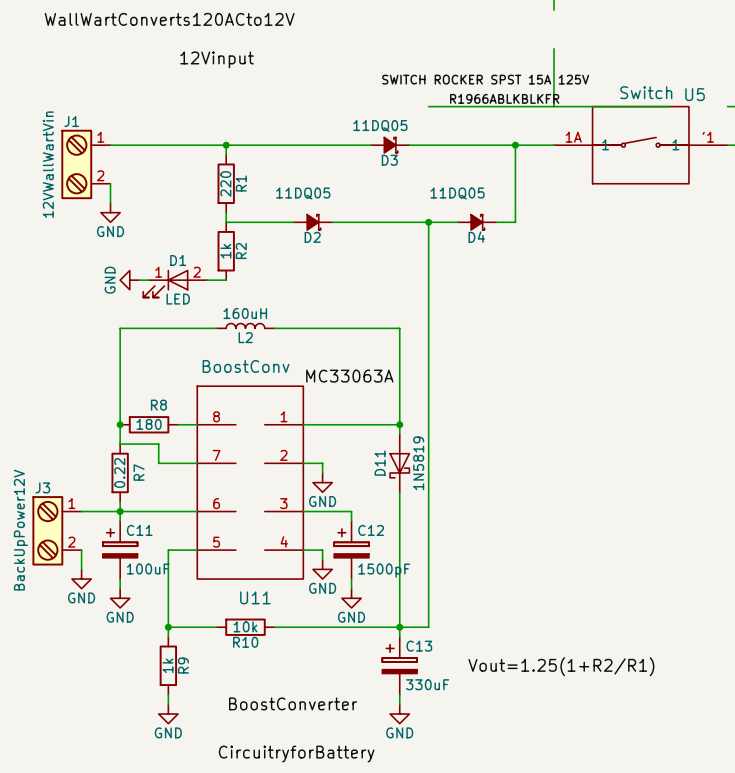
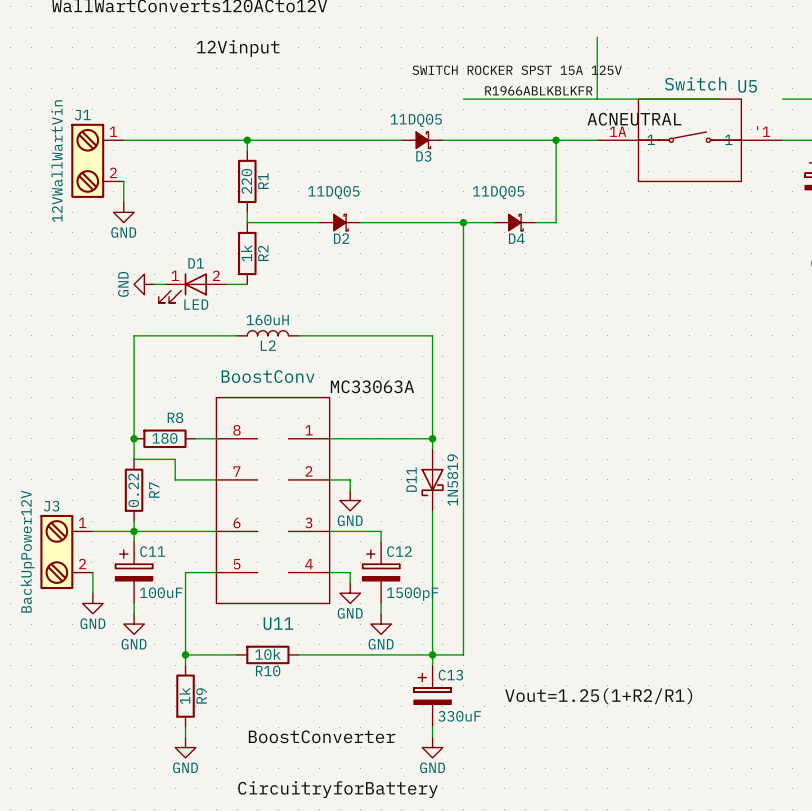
label: none -> ACNEUTRAL (634, 119)

